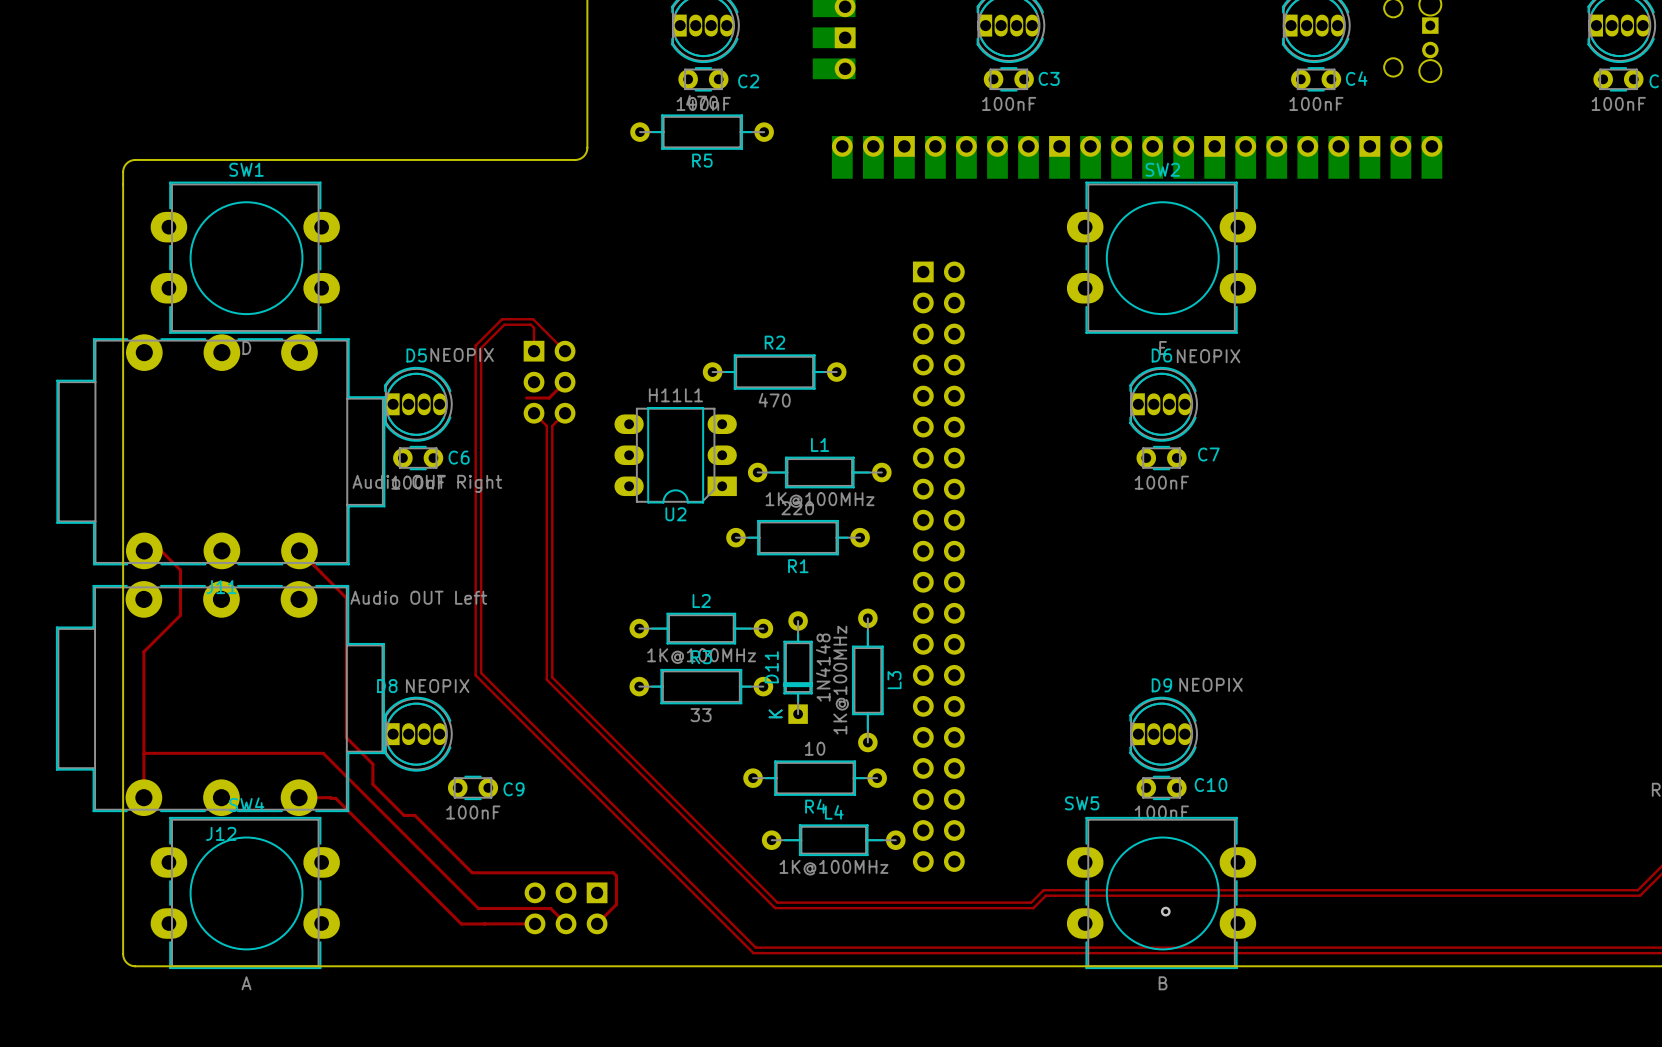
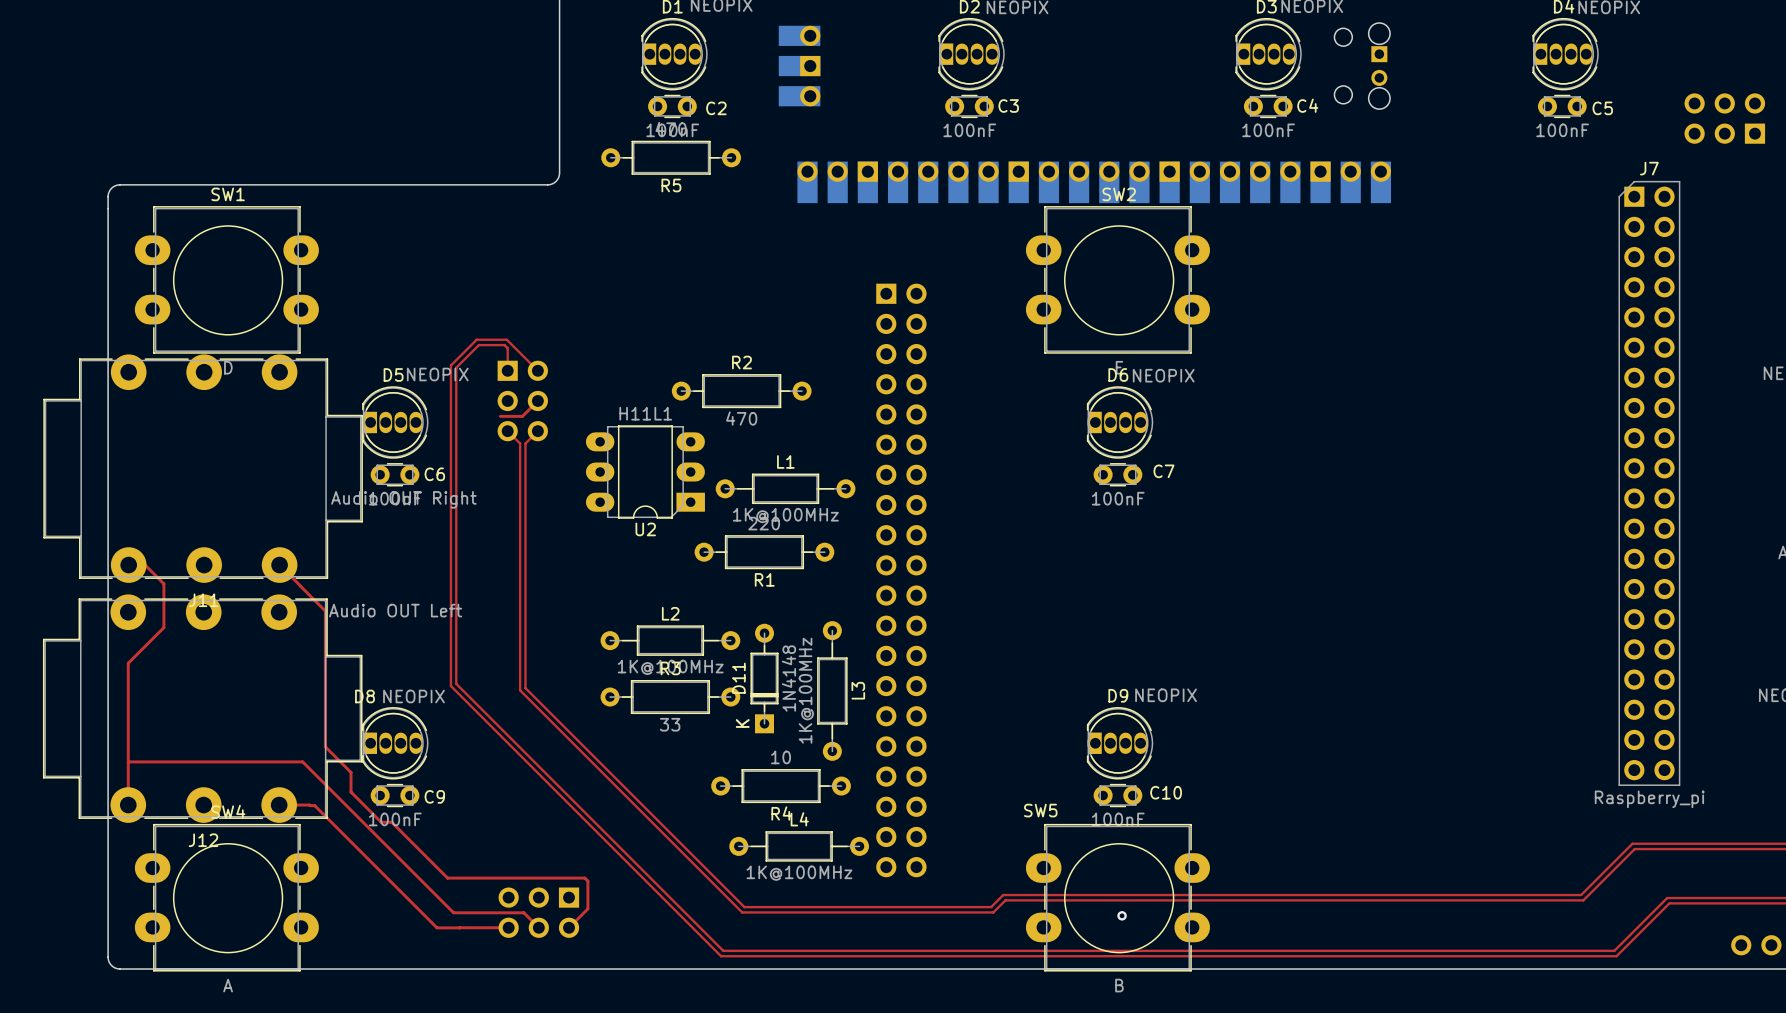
C9 position: (473, 787) -> (395, 795)

